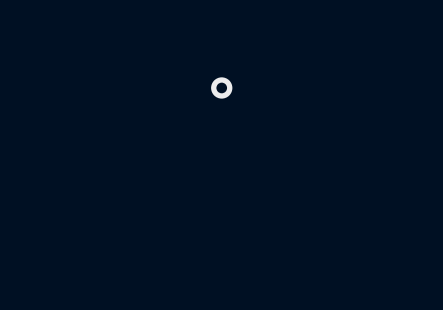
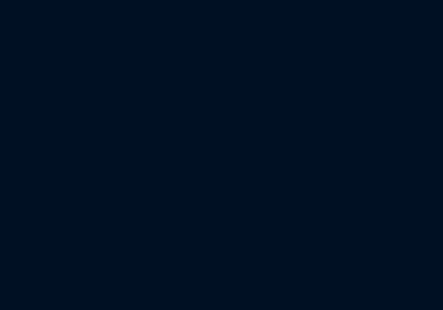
via: (221, 87) -> none

